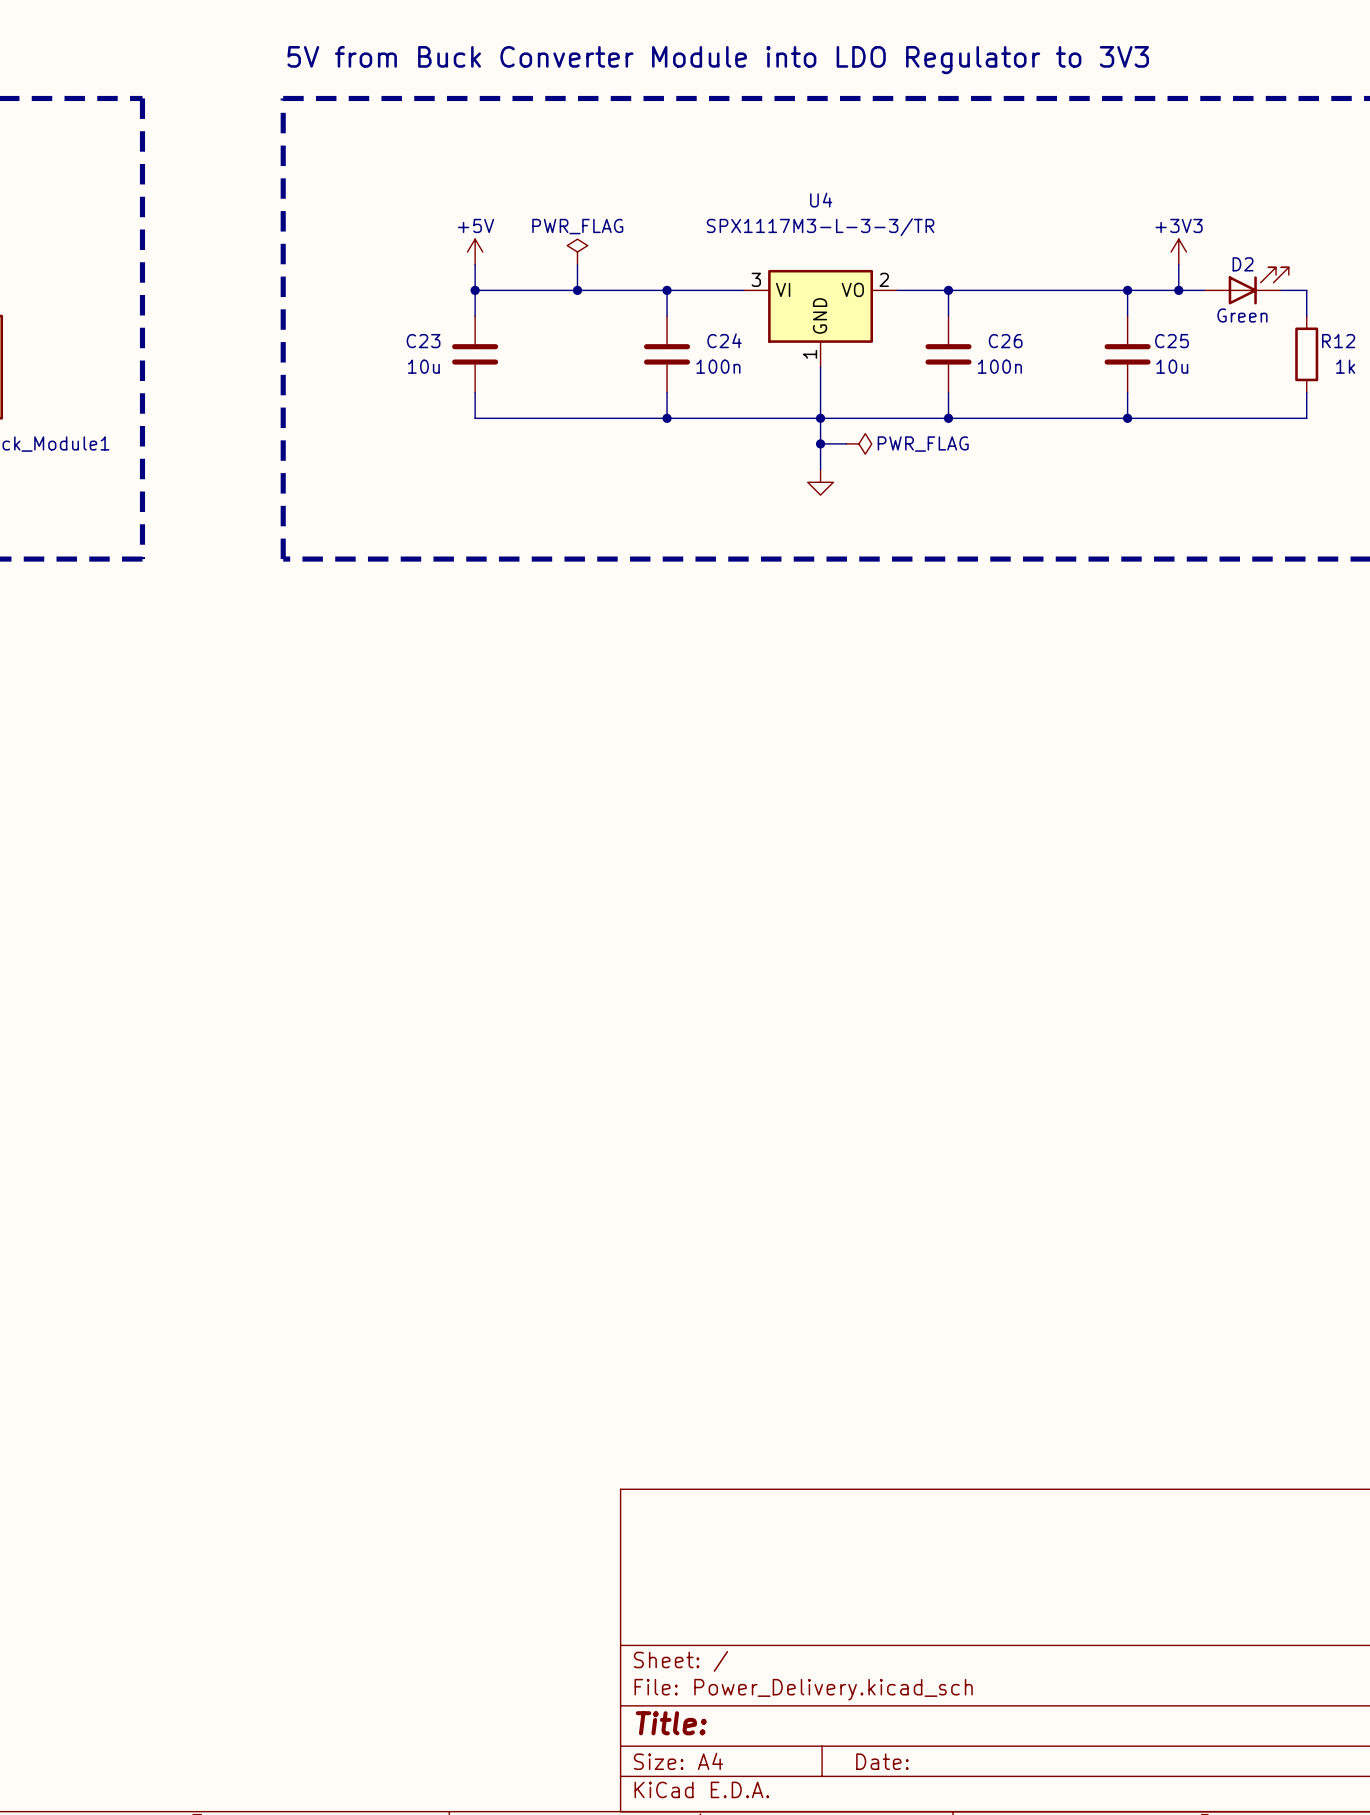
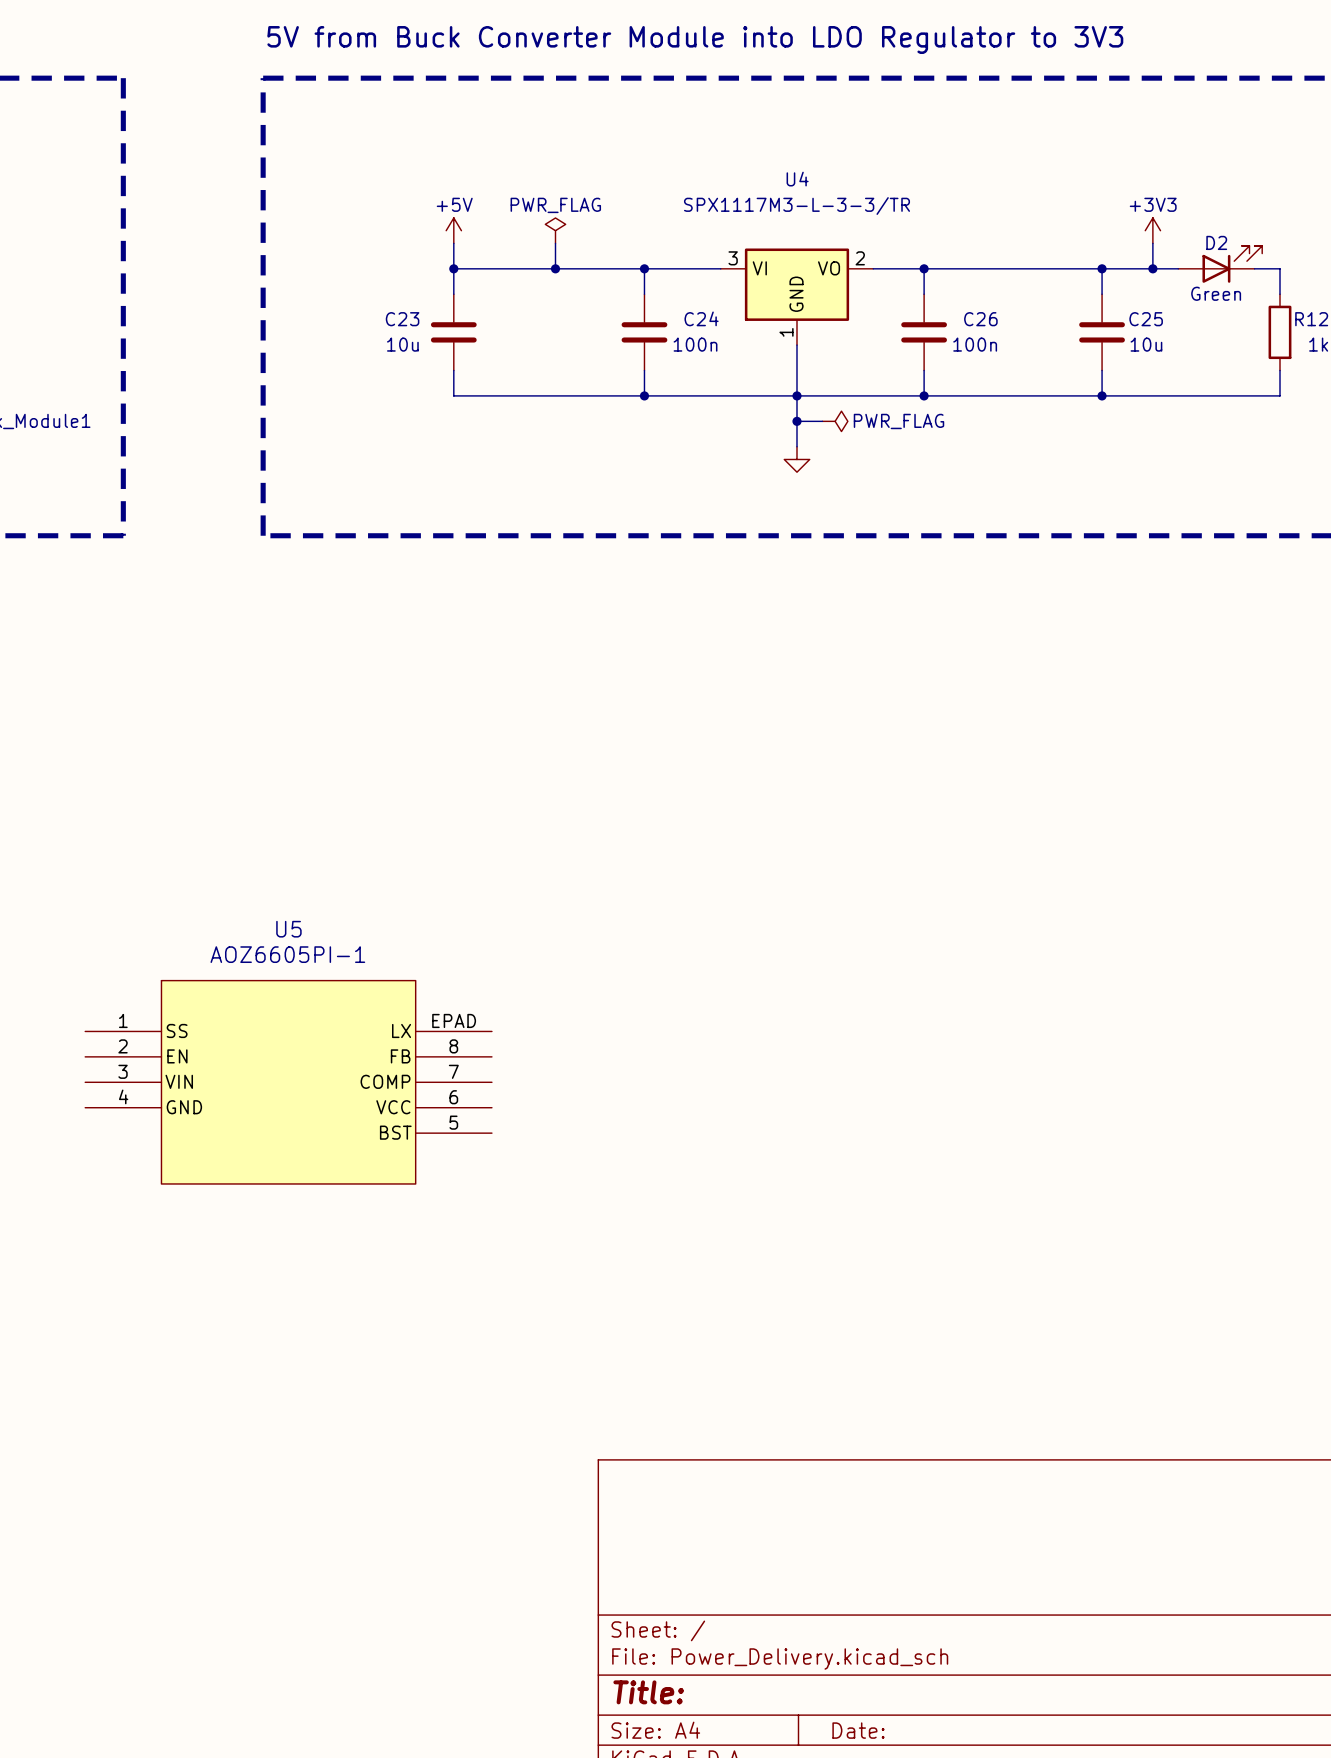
U5: none -> AOZ6605PI-1 (288, 1082)

